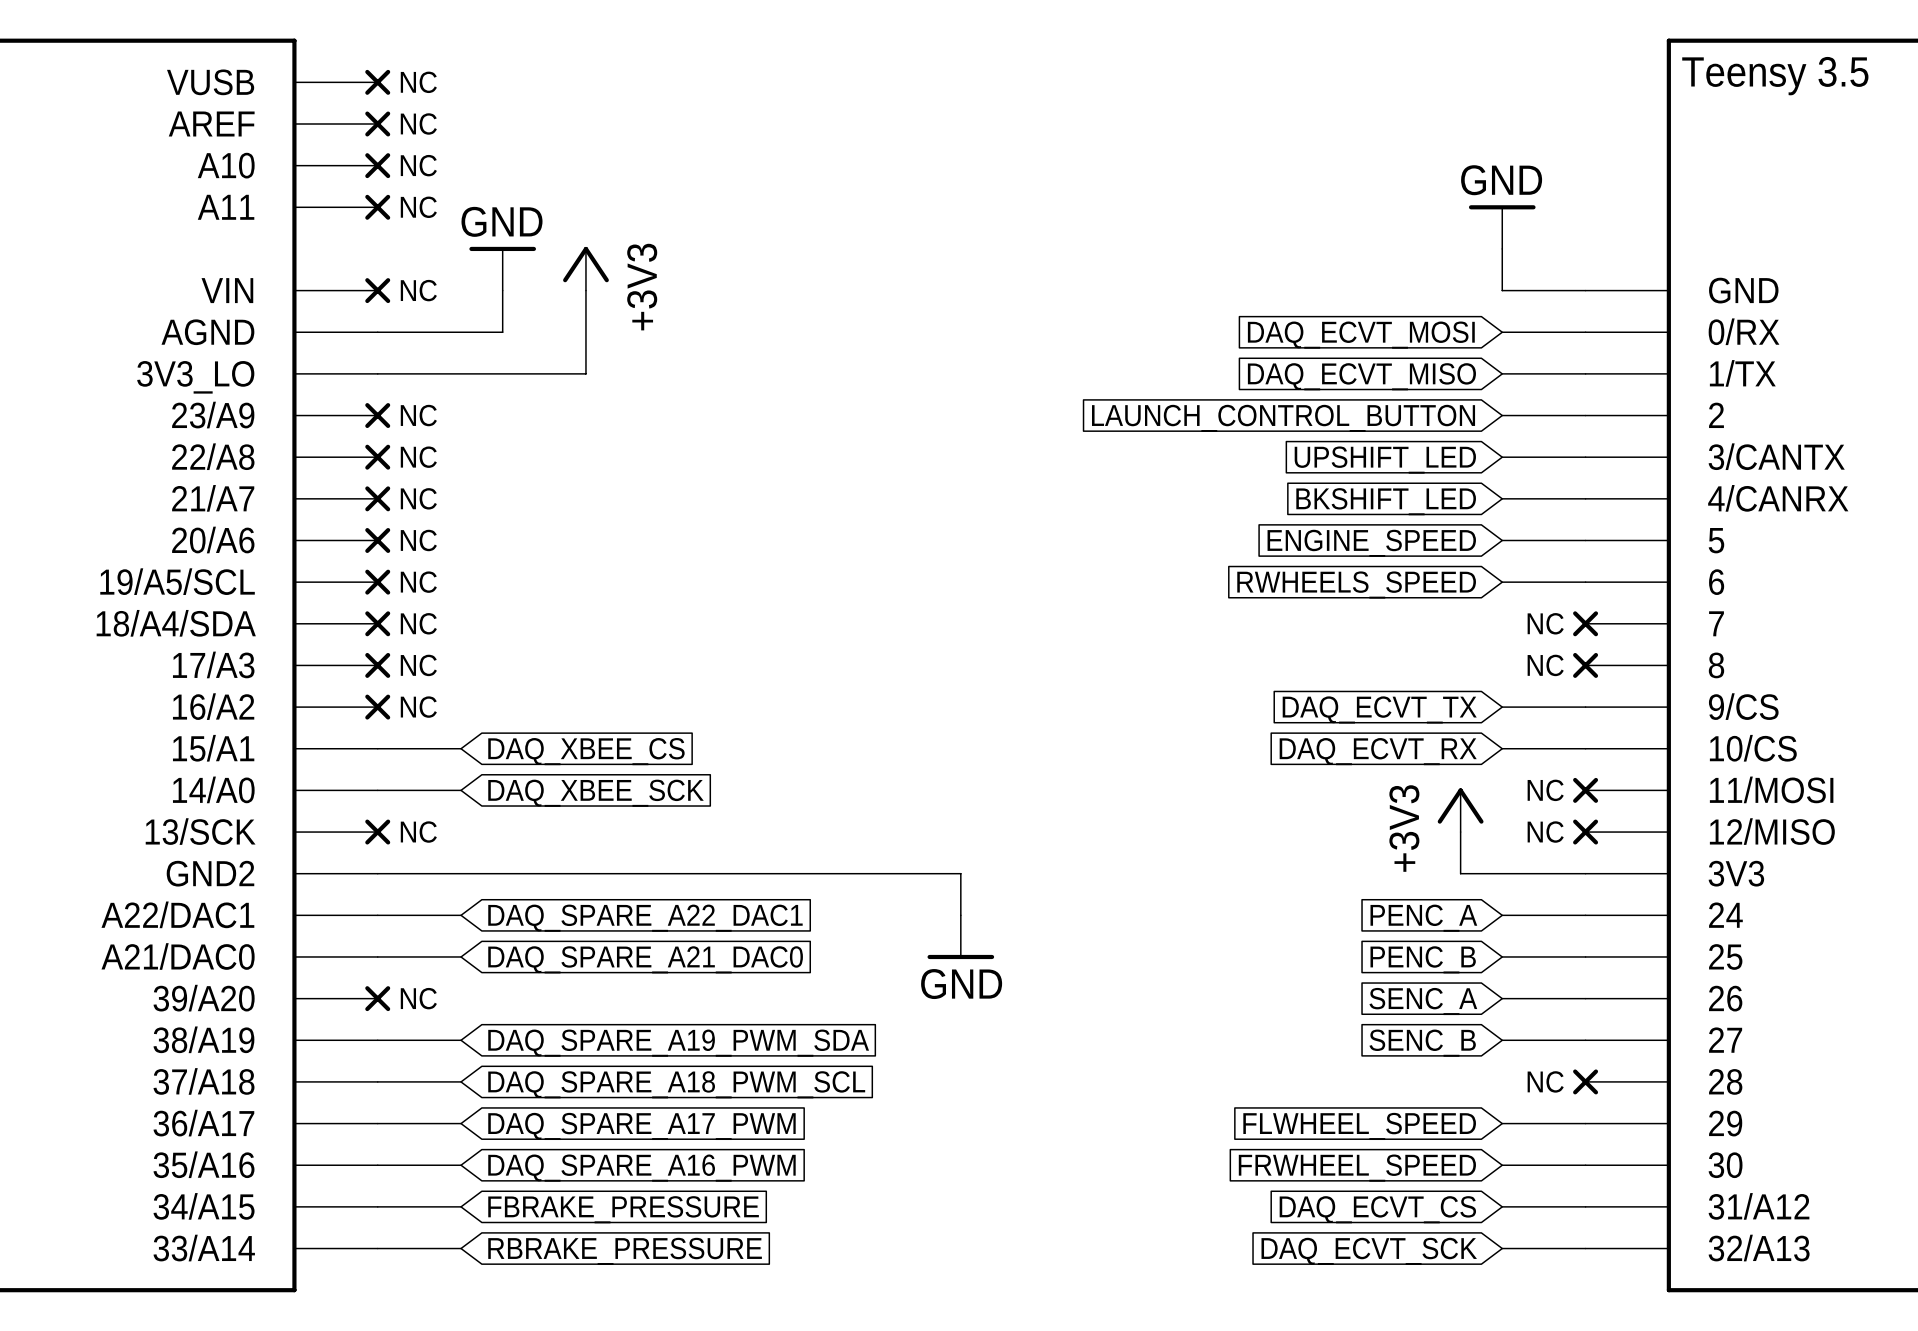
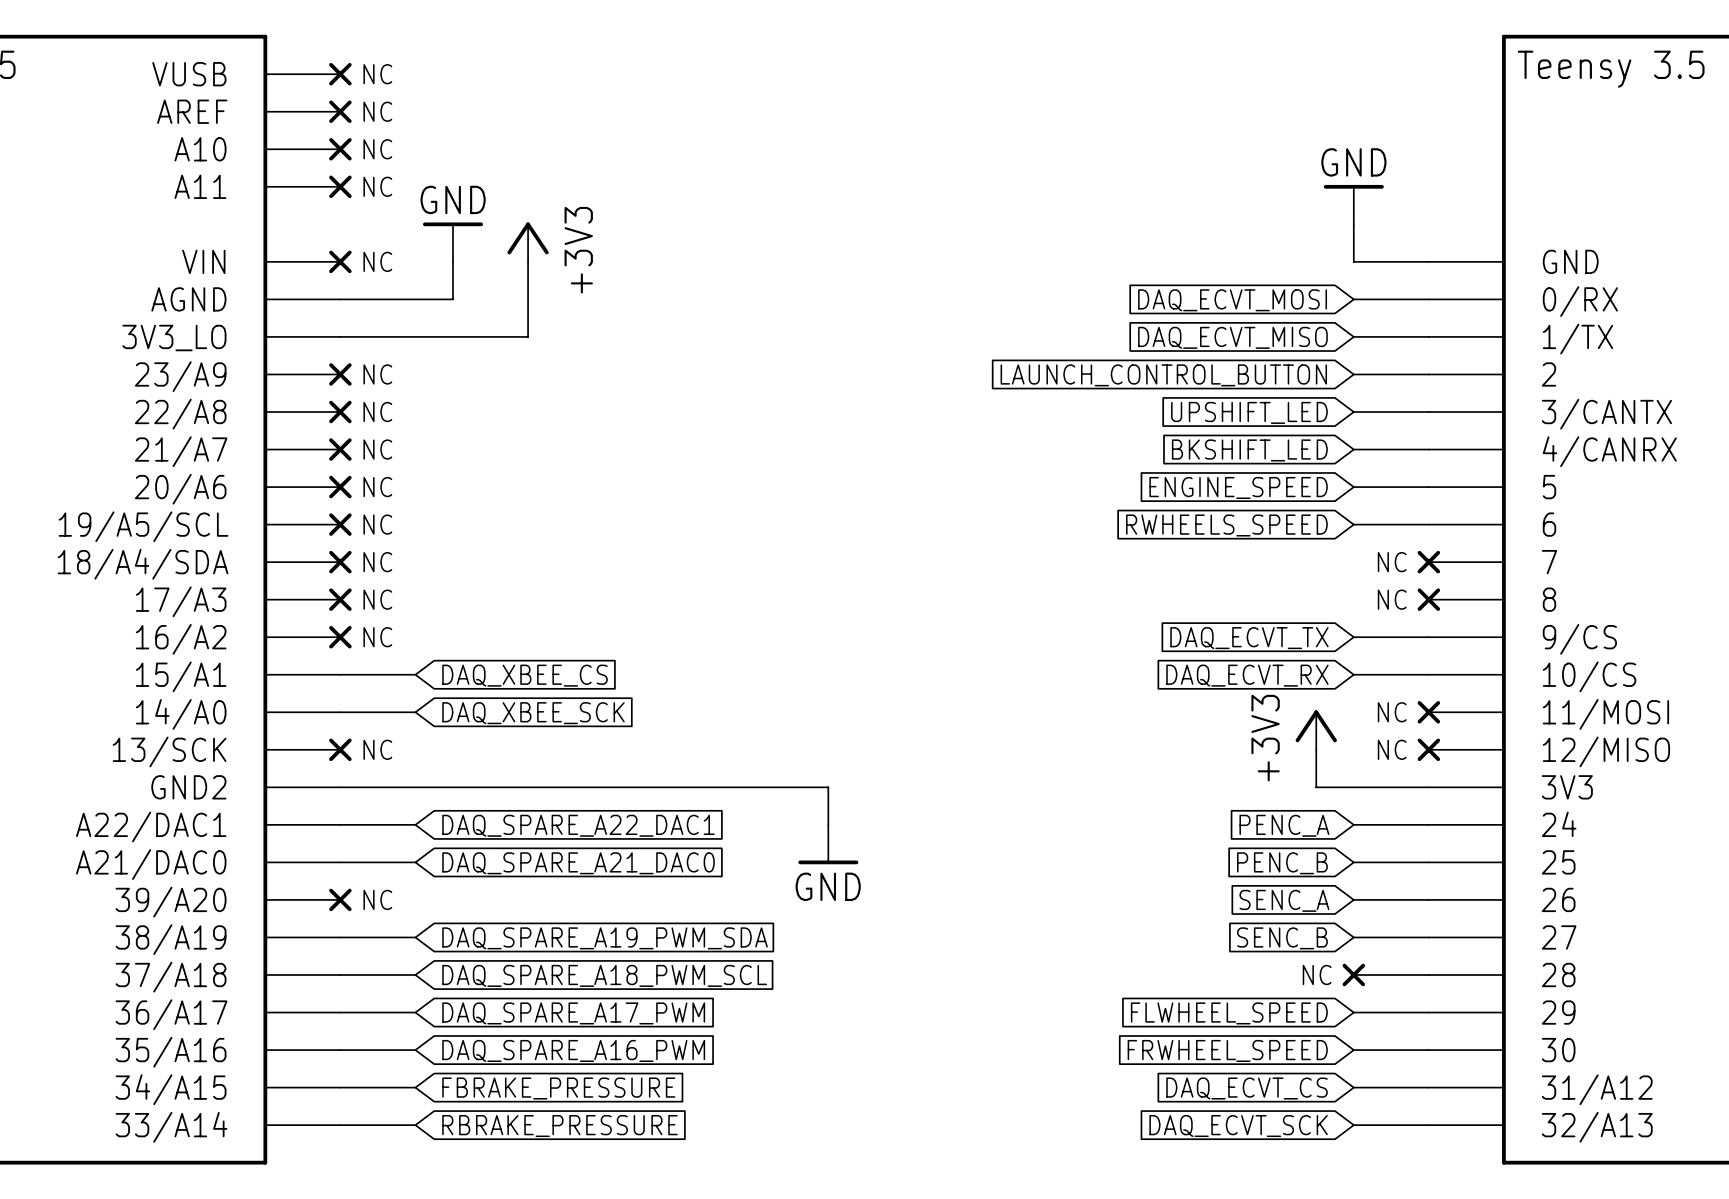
wire: (919, 873) (960, 873) (960, 915) -> (828, 787) (828, 824)
power symbol position: GND (960, 937) -> GND (828, 844)
wire: none -> (1353, 975) (1428, 975)
part position: (1585, 1081) -> (1353, 975)

